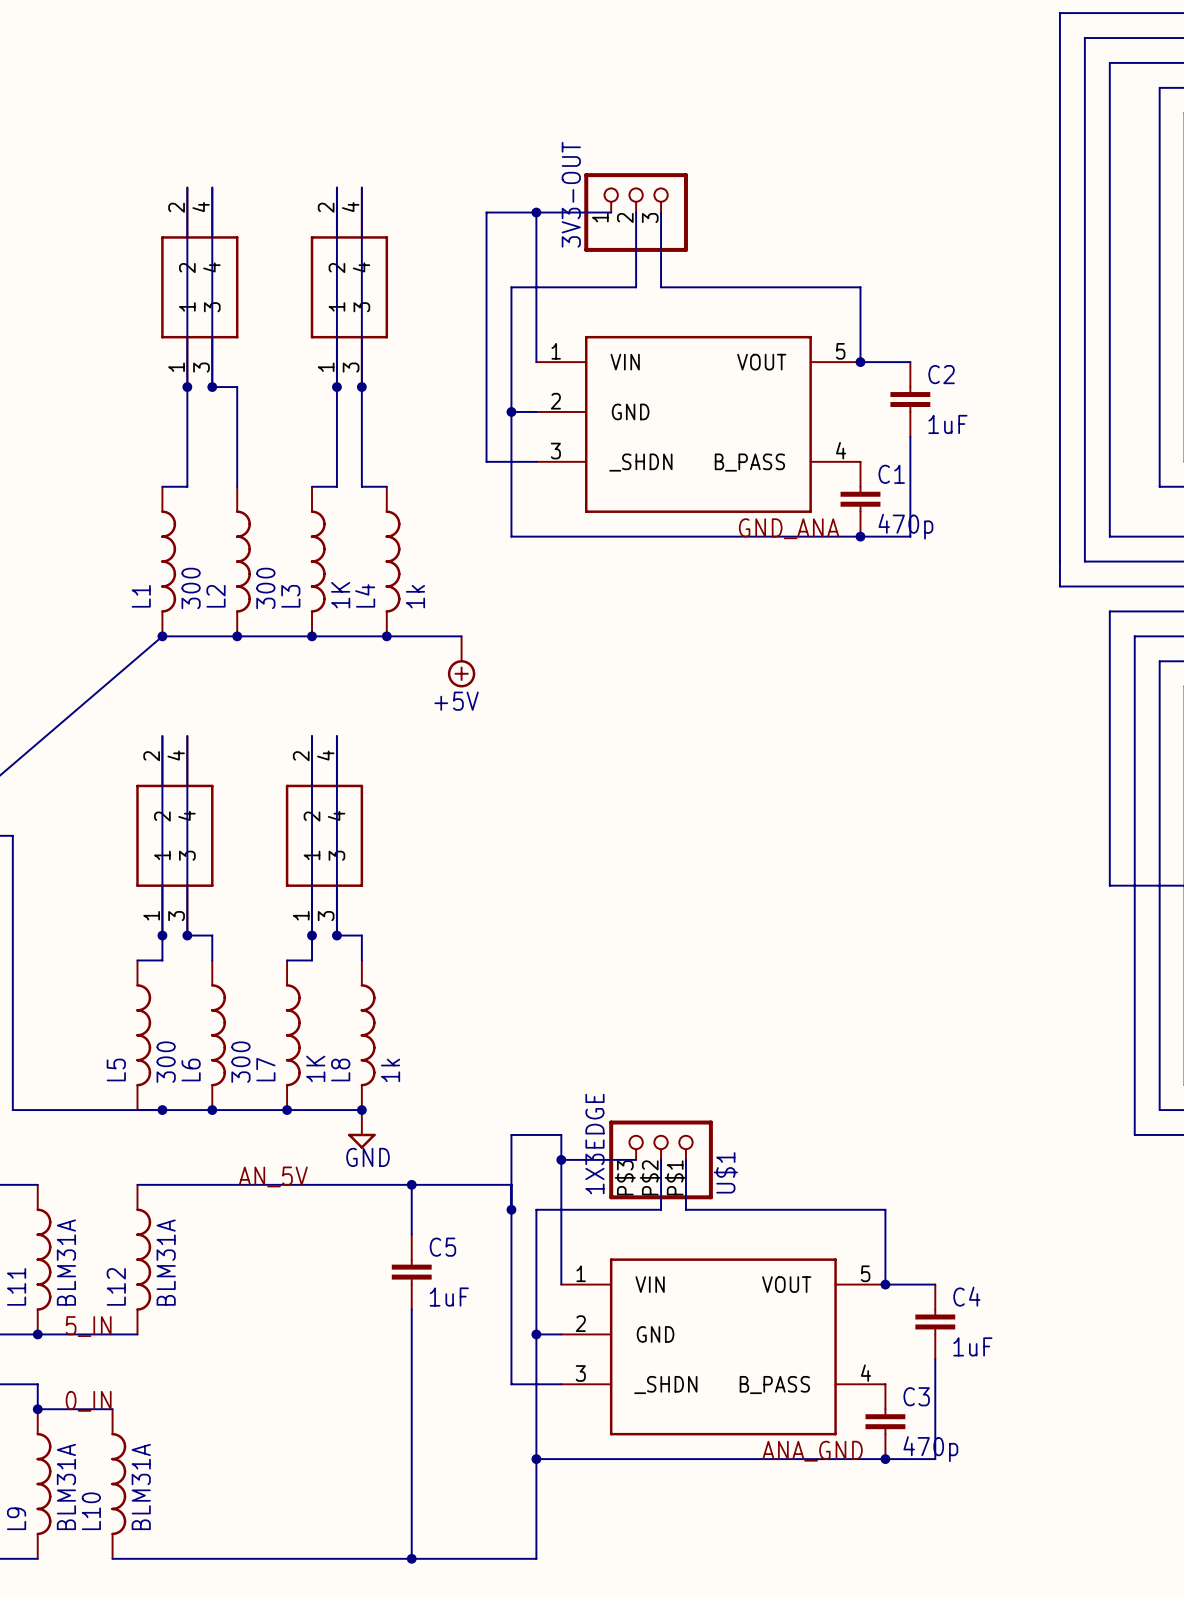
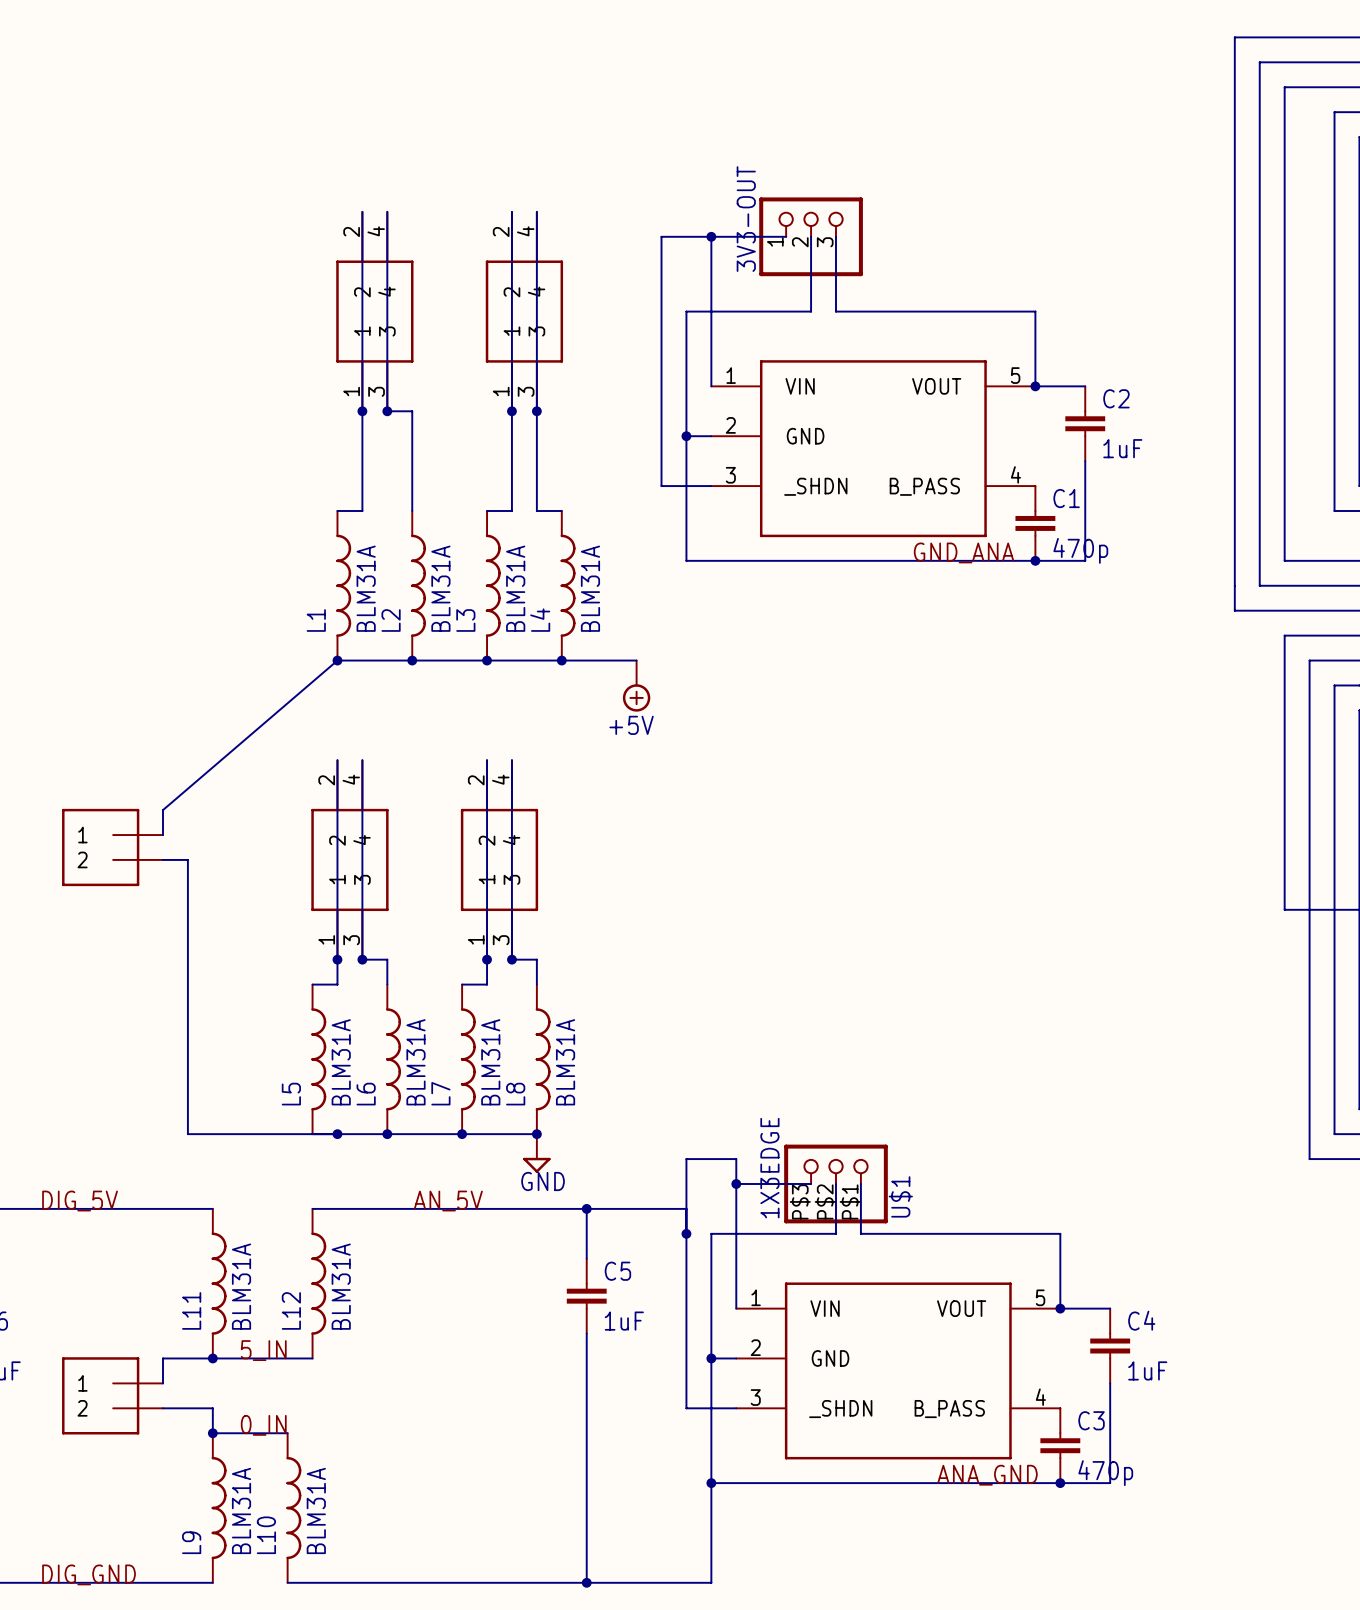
L1 value: 300 (191, 588) -> BLM31A (366, 588)
L2 value: 300 (265, 588) -> BLM31A (440, 588)
L3 value: 1K (340, 595) -> BLM31A (515, 588)
L4 value: 1k (415, 596) -> BLM31A (590, 588)
L5 value: 300 (166, 1062) -> BLM31A (341, 1062)
L6 value: 300 (240, 1062) -> BLM31A (415, 1062)
L7 value: 1K (315, 1068) -> BLM31A (490, 1062)
L8 value: 1k (390, 1070) -> BLM31A (565, 1062)

